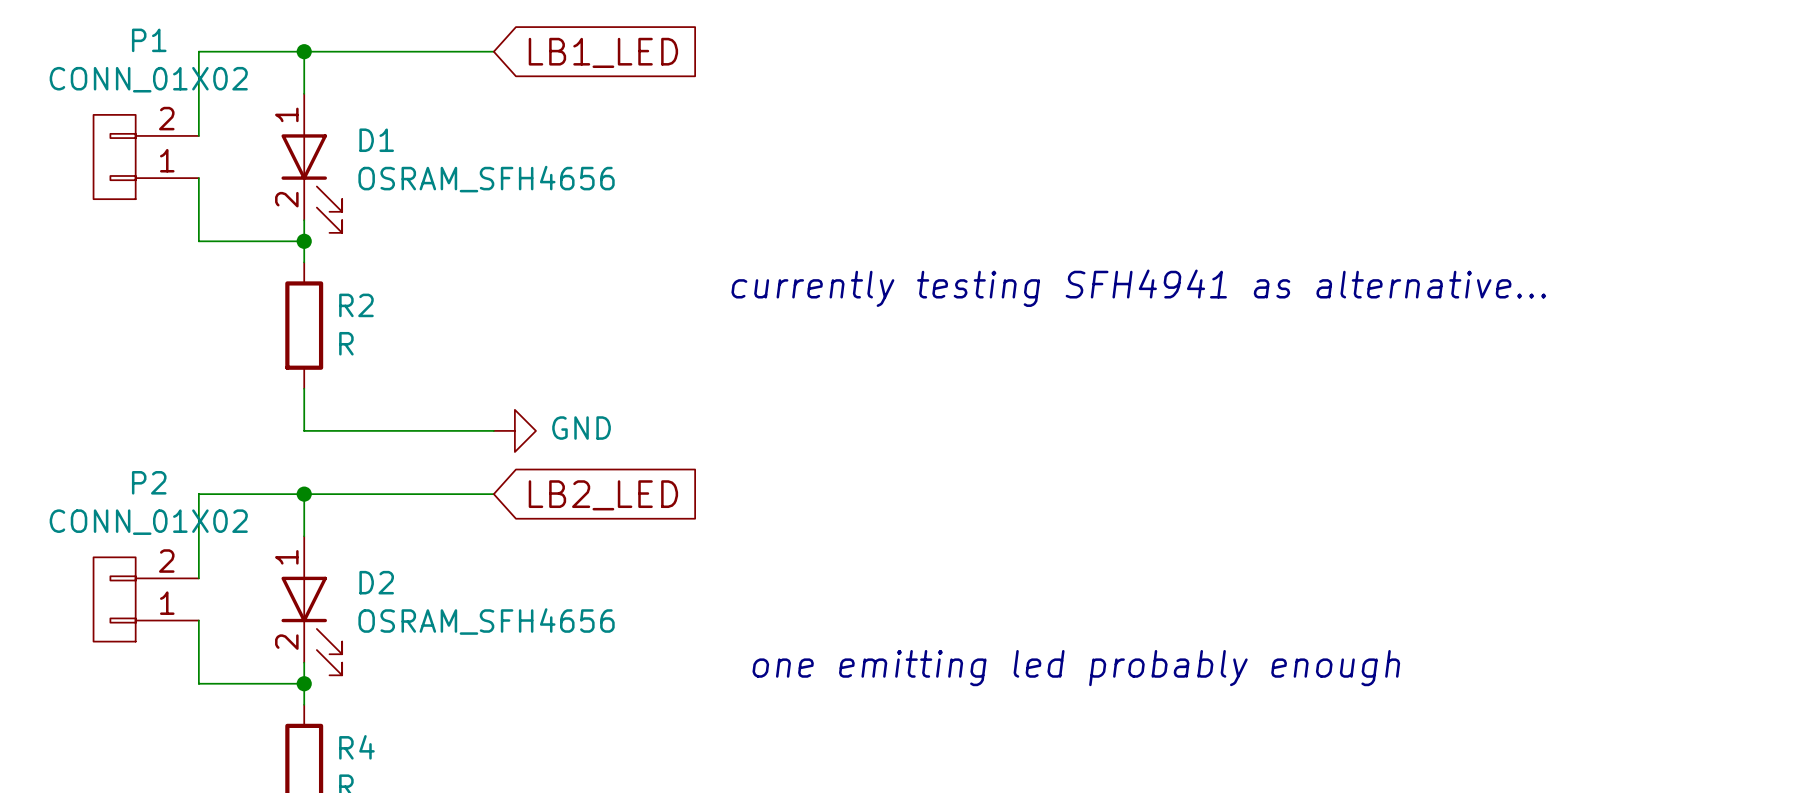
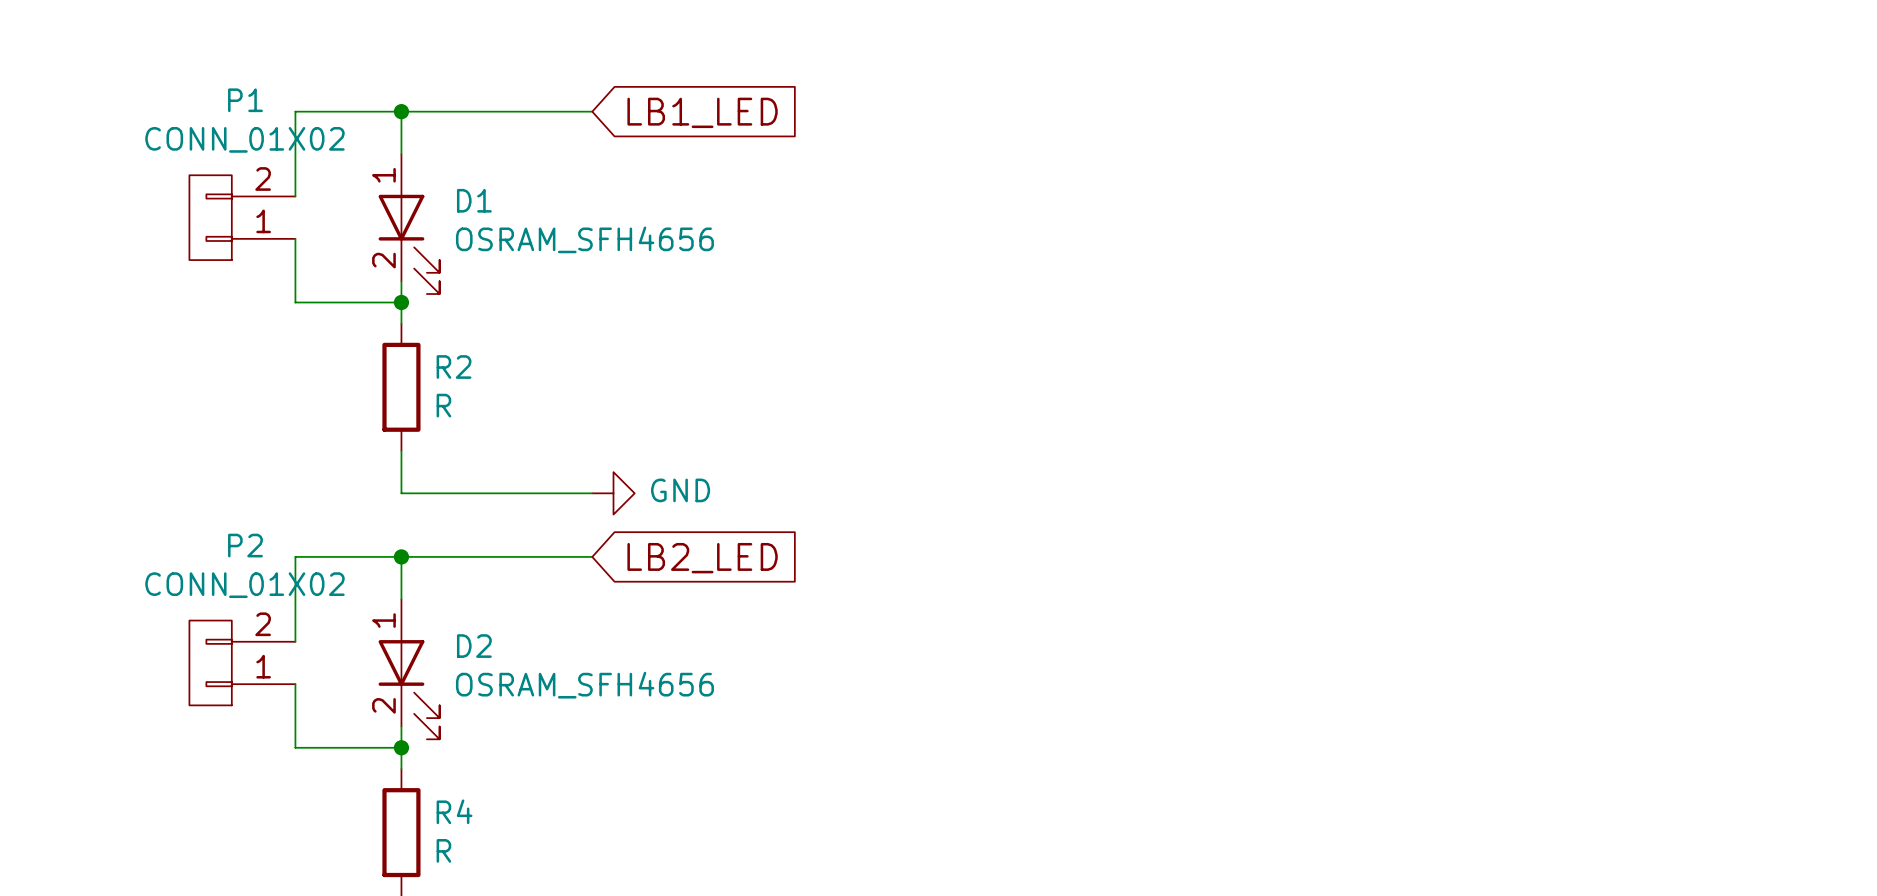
text: currently testing SFH4941 as alternative… (1138, 288) -> none
text: one emitting led probably enough (1076, 668) -> none

